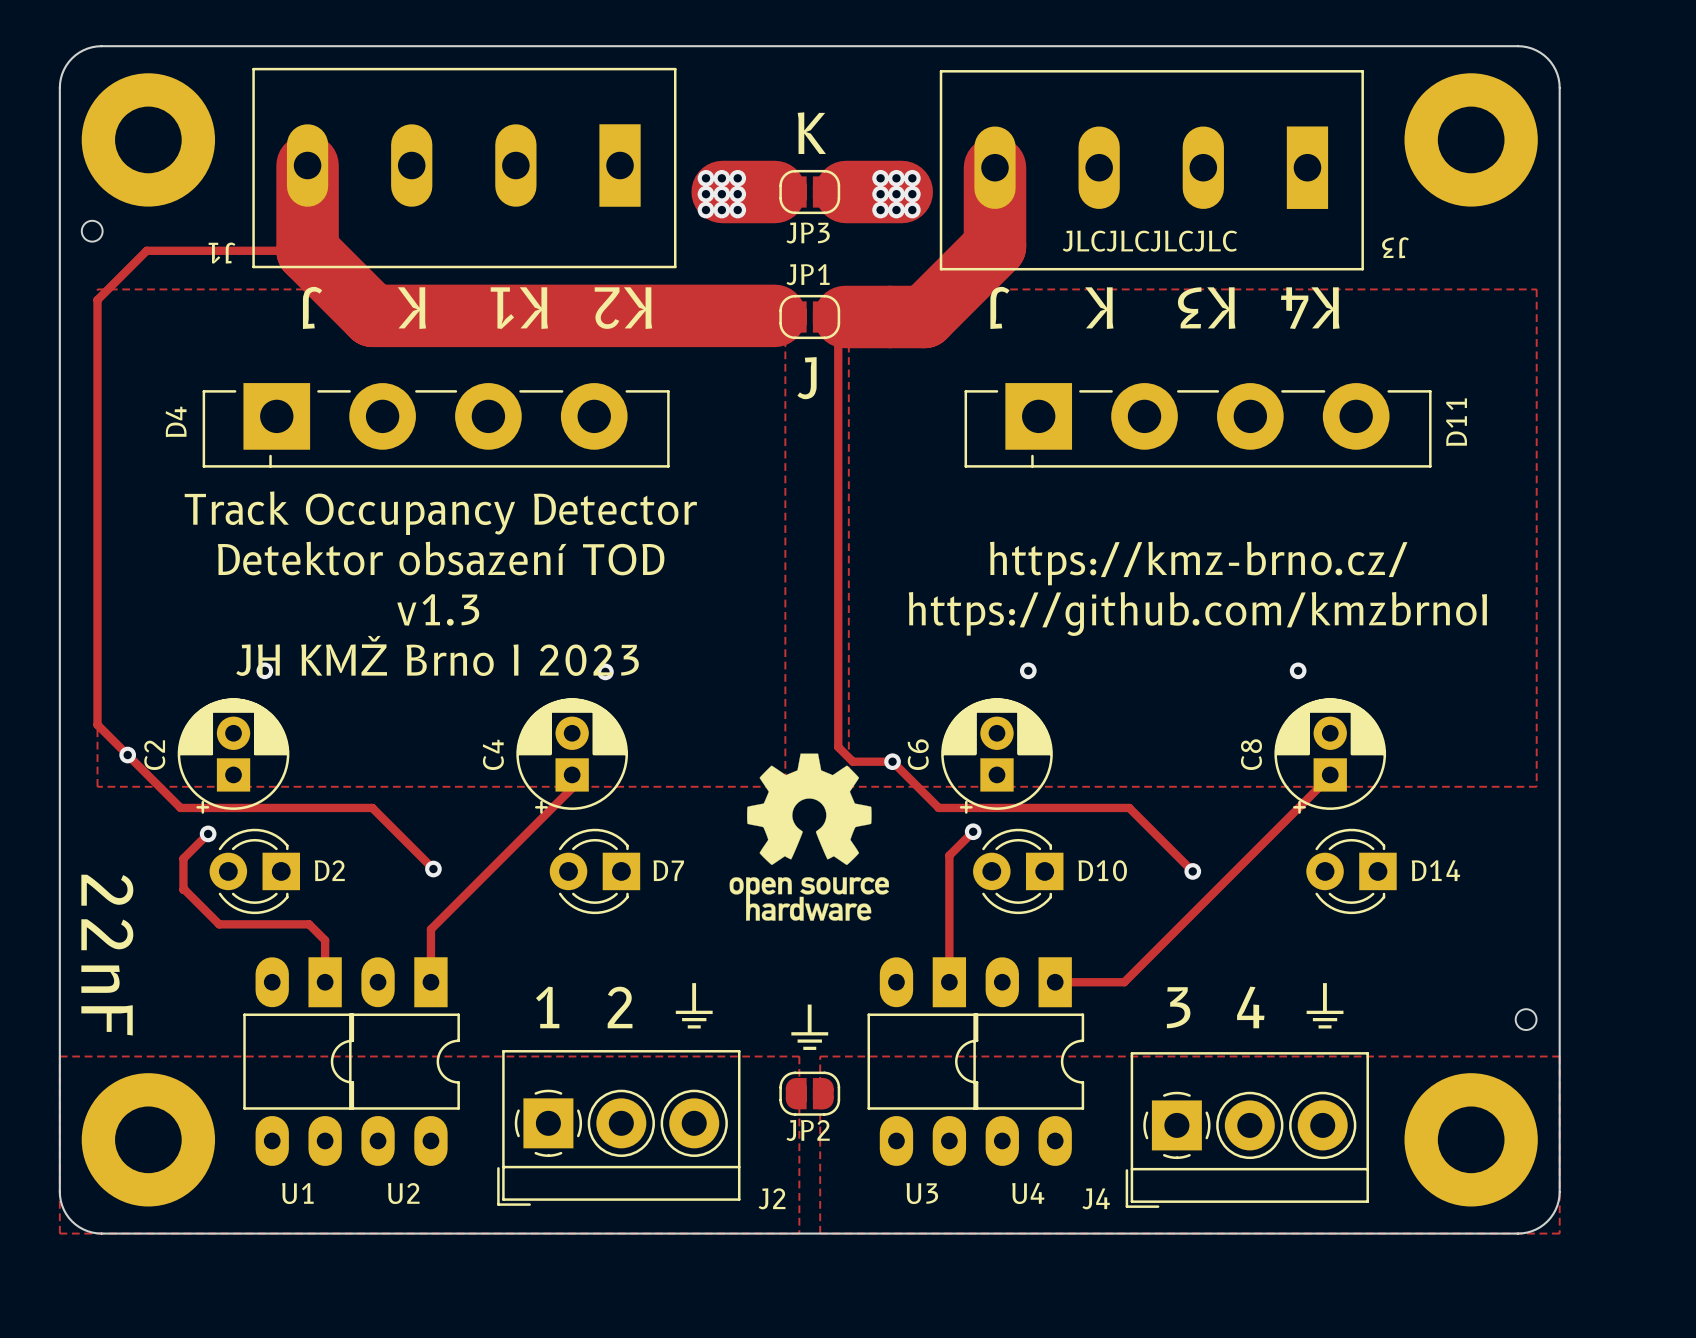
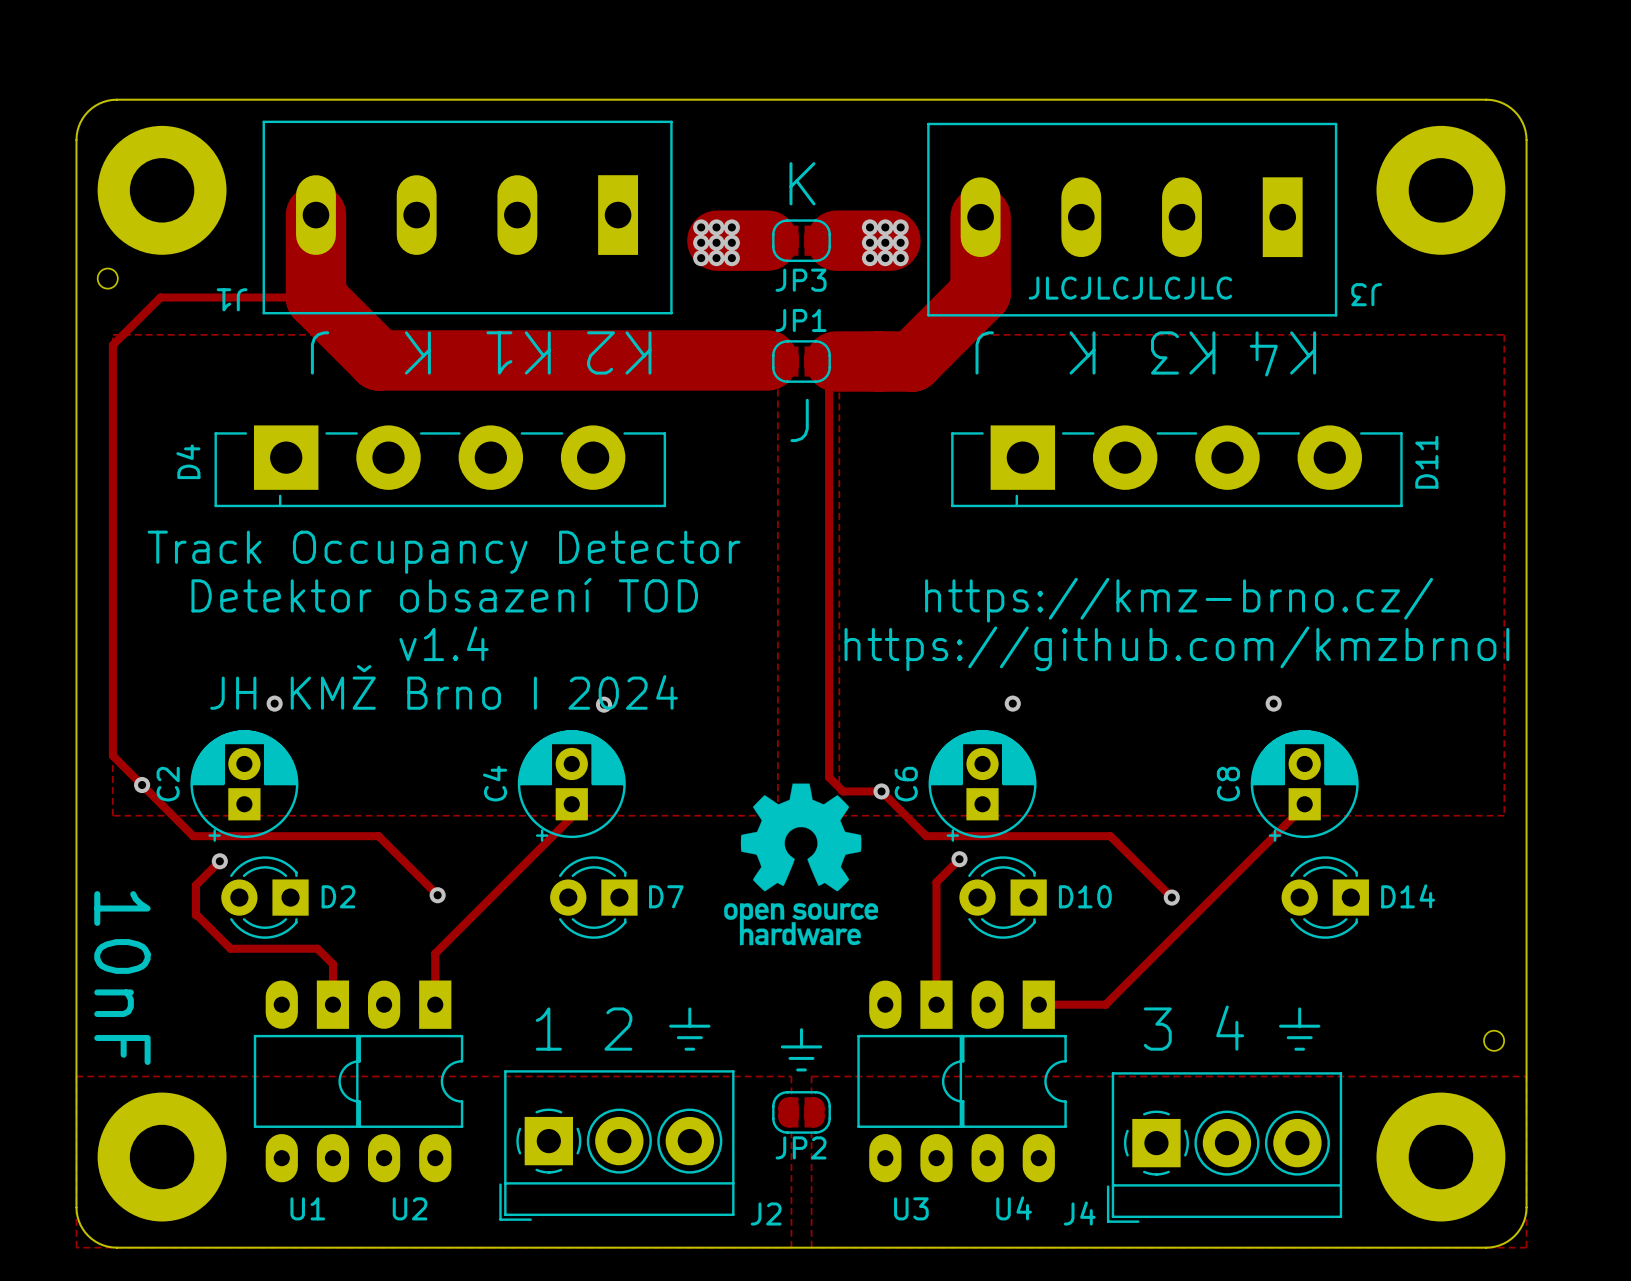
text: v1.3 (438, 609) -> v1.4 (444, 643)
text: JH KMŽ Brno I 2023 (437, 655) -> JH KMŽ Brno I 2024 (444, 687)
text: 22nF (107, 955) -> 10nF (122, 978)

